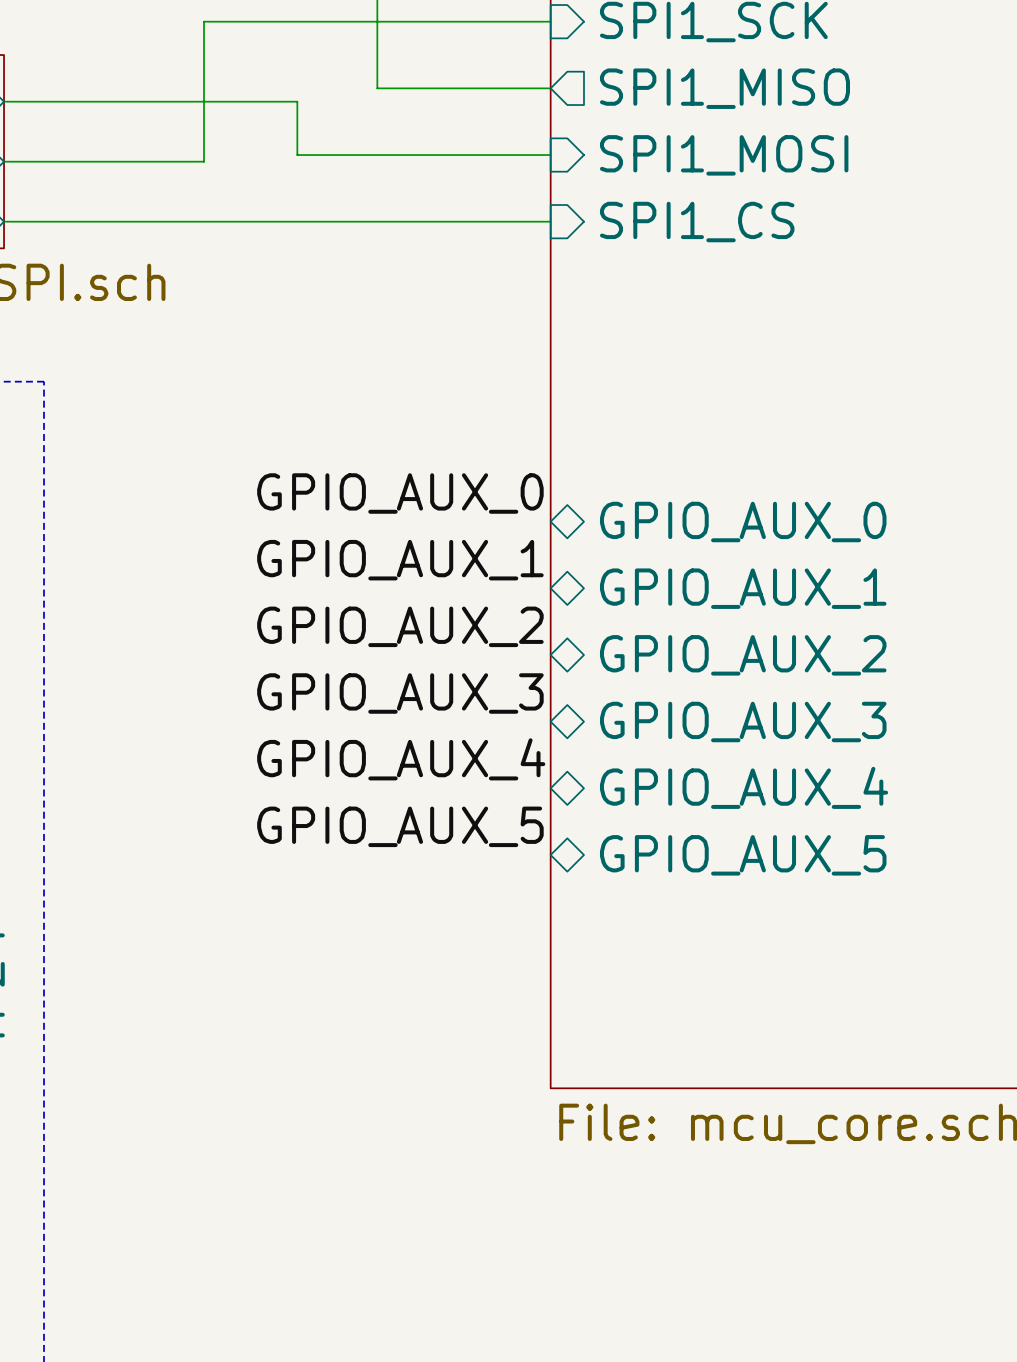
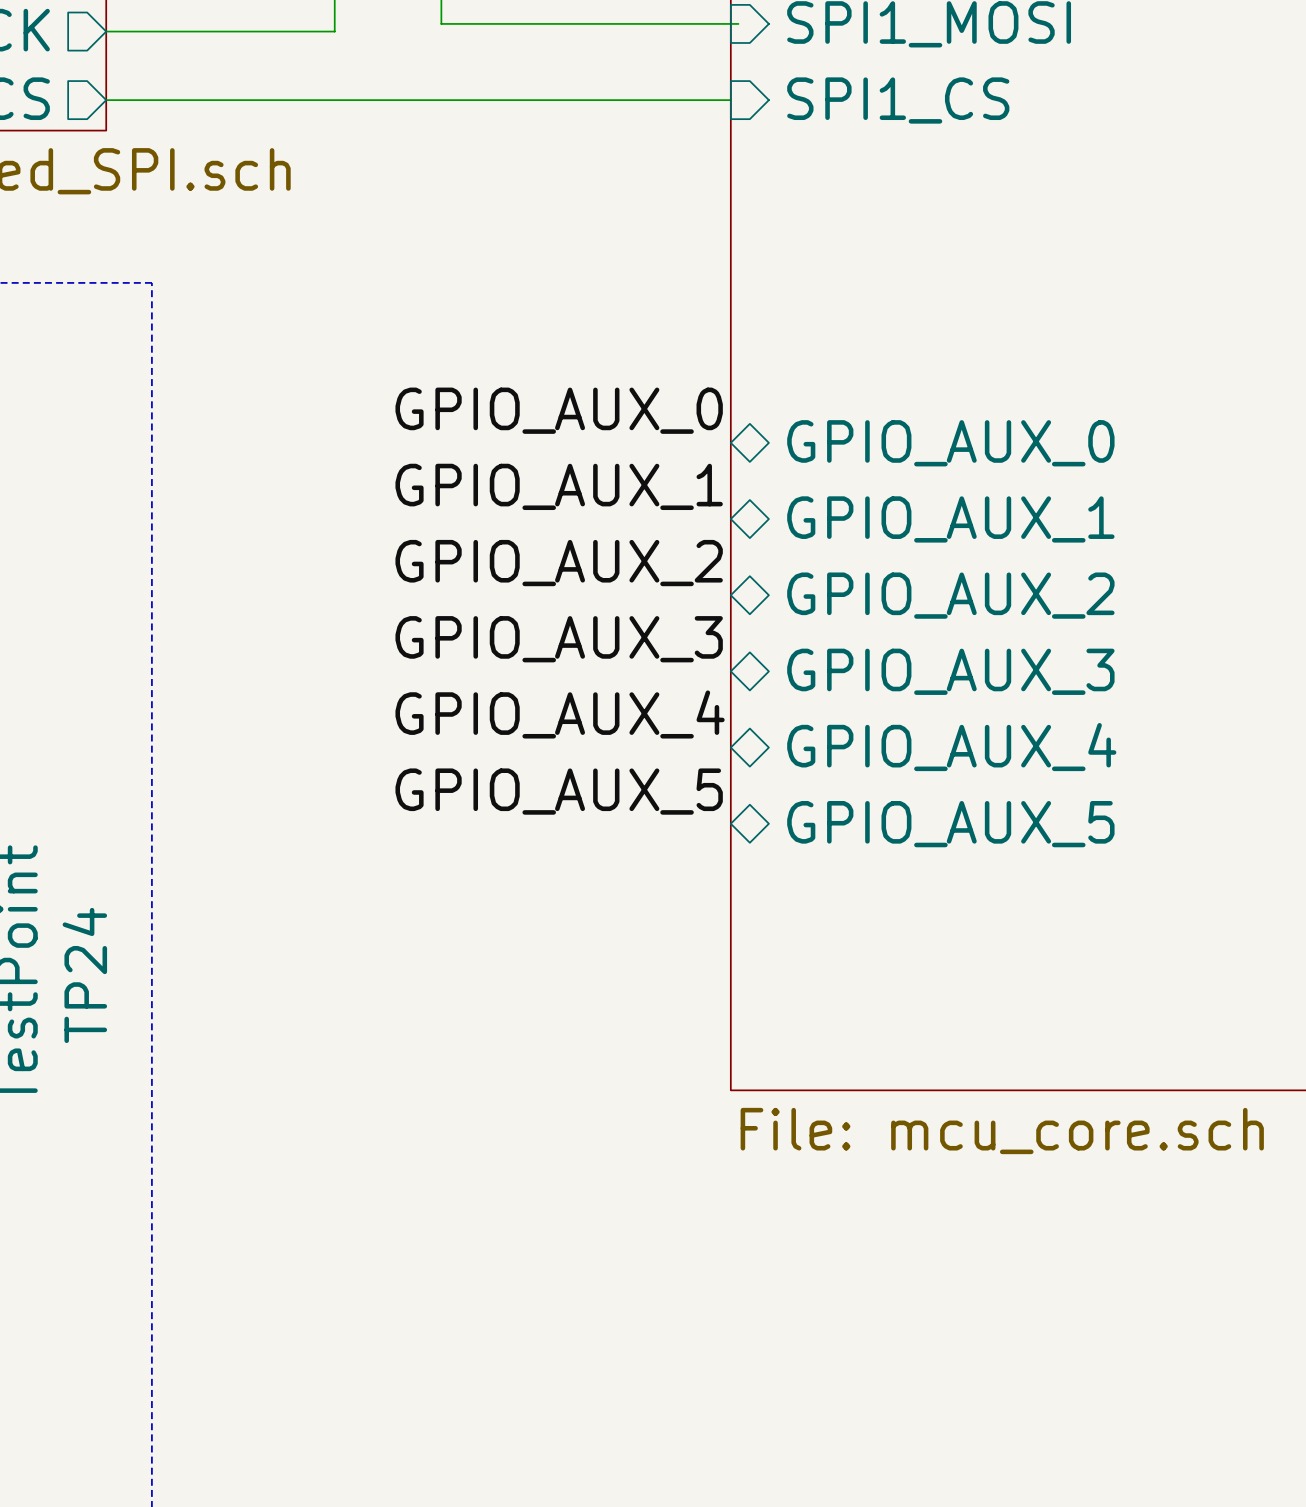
wire: none -> (730, 23) (738, 23)

